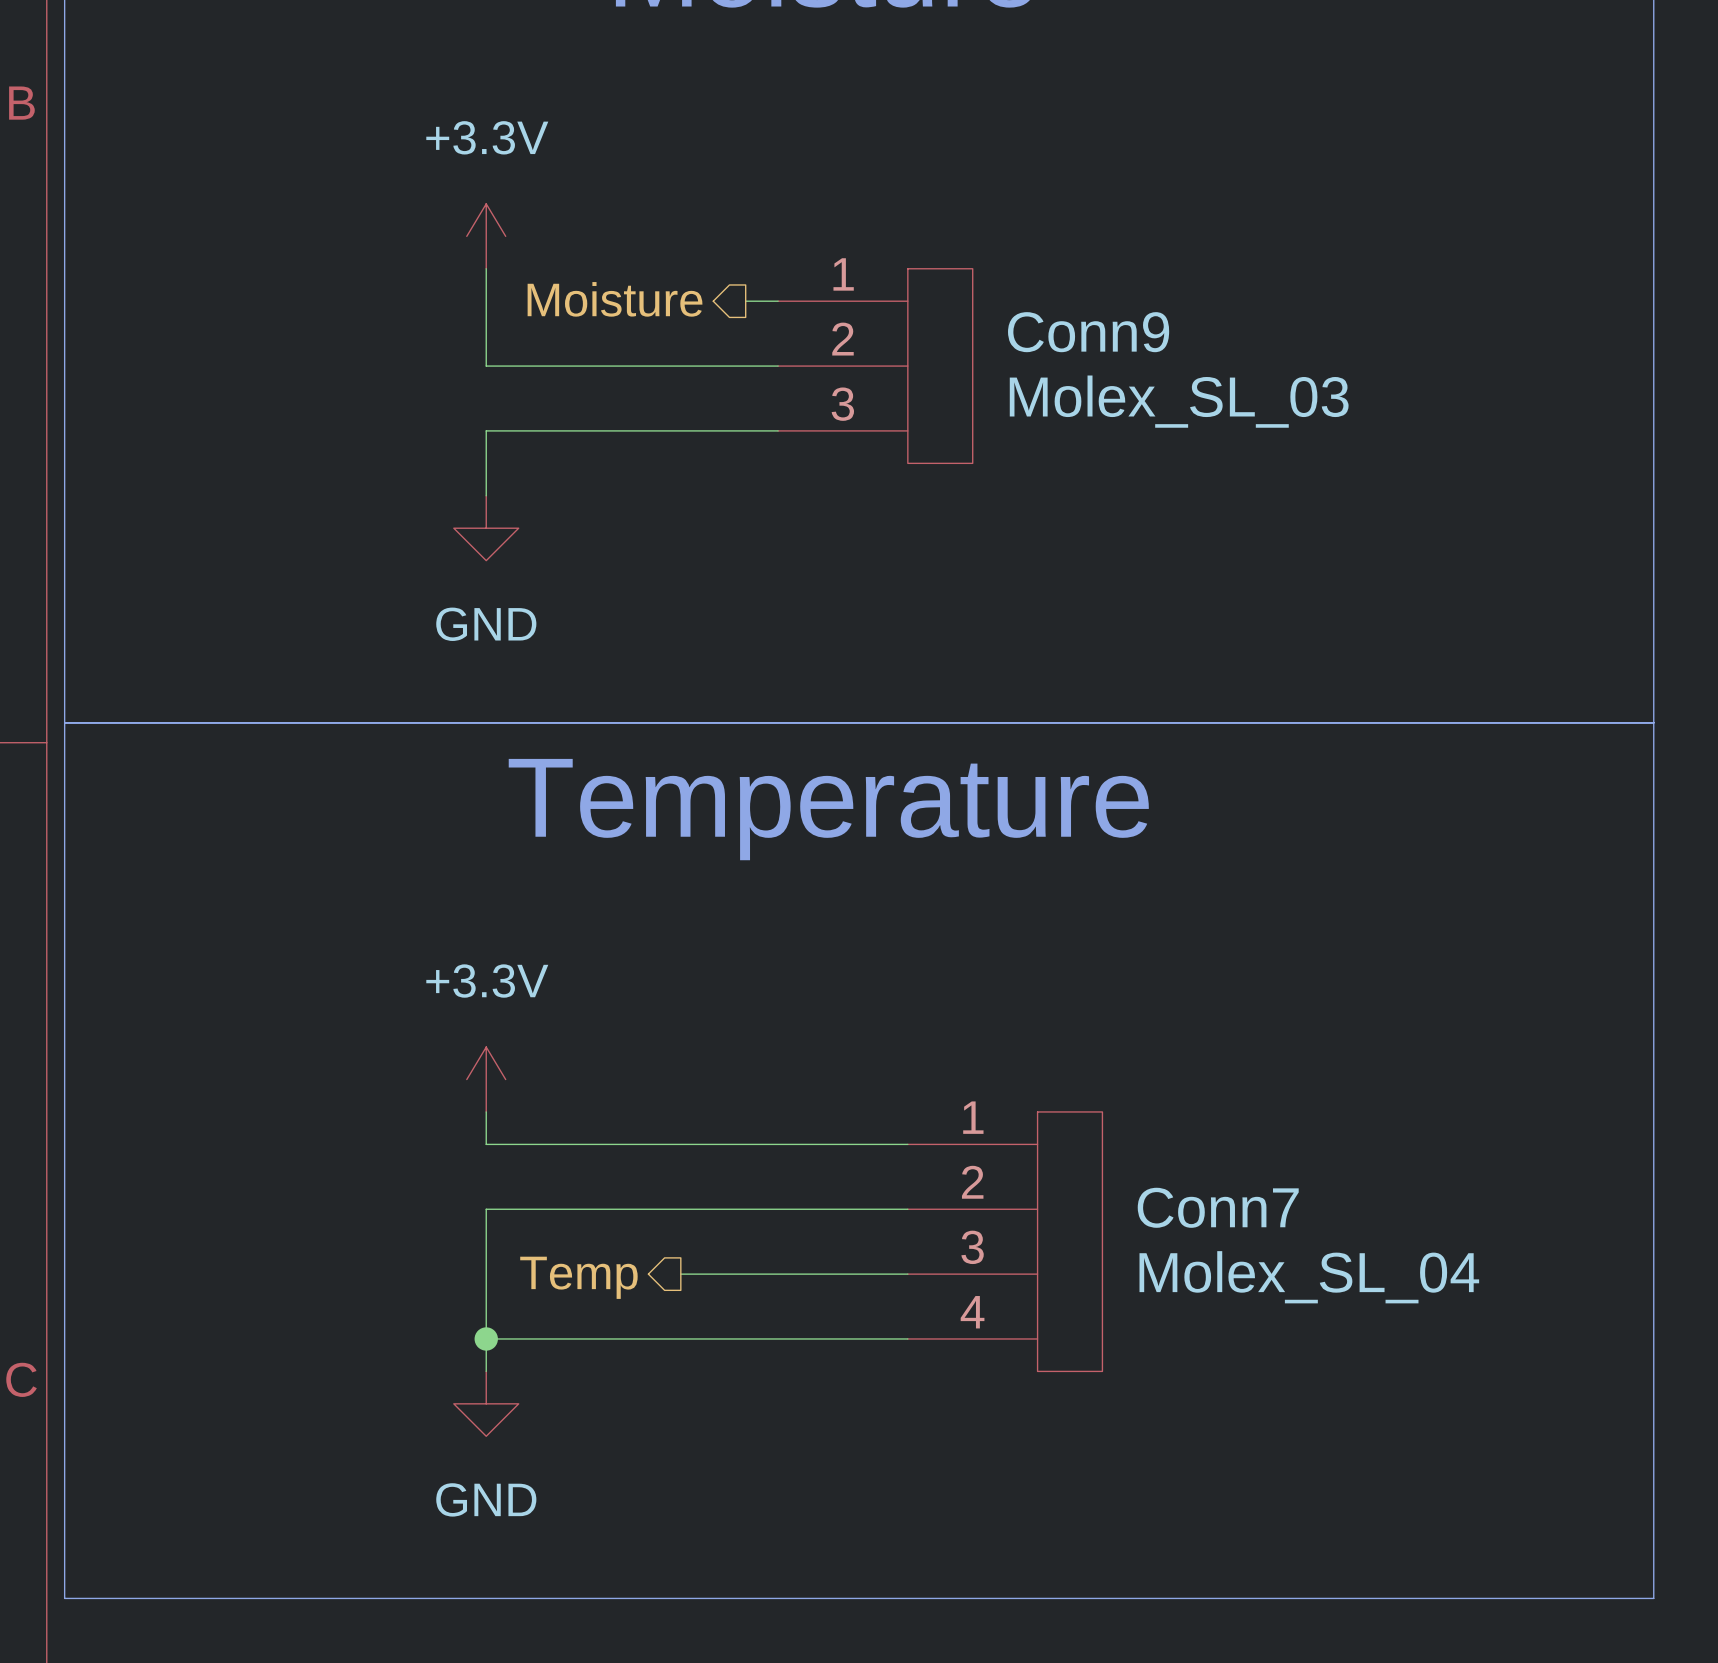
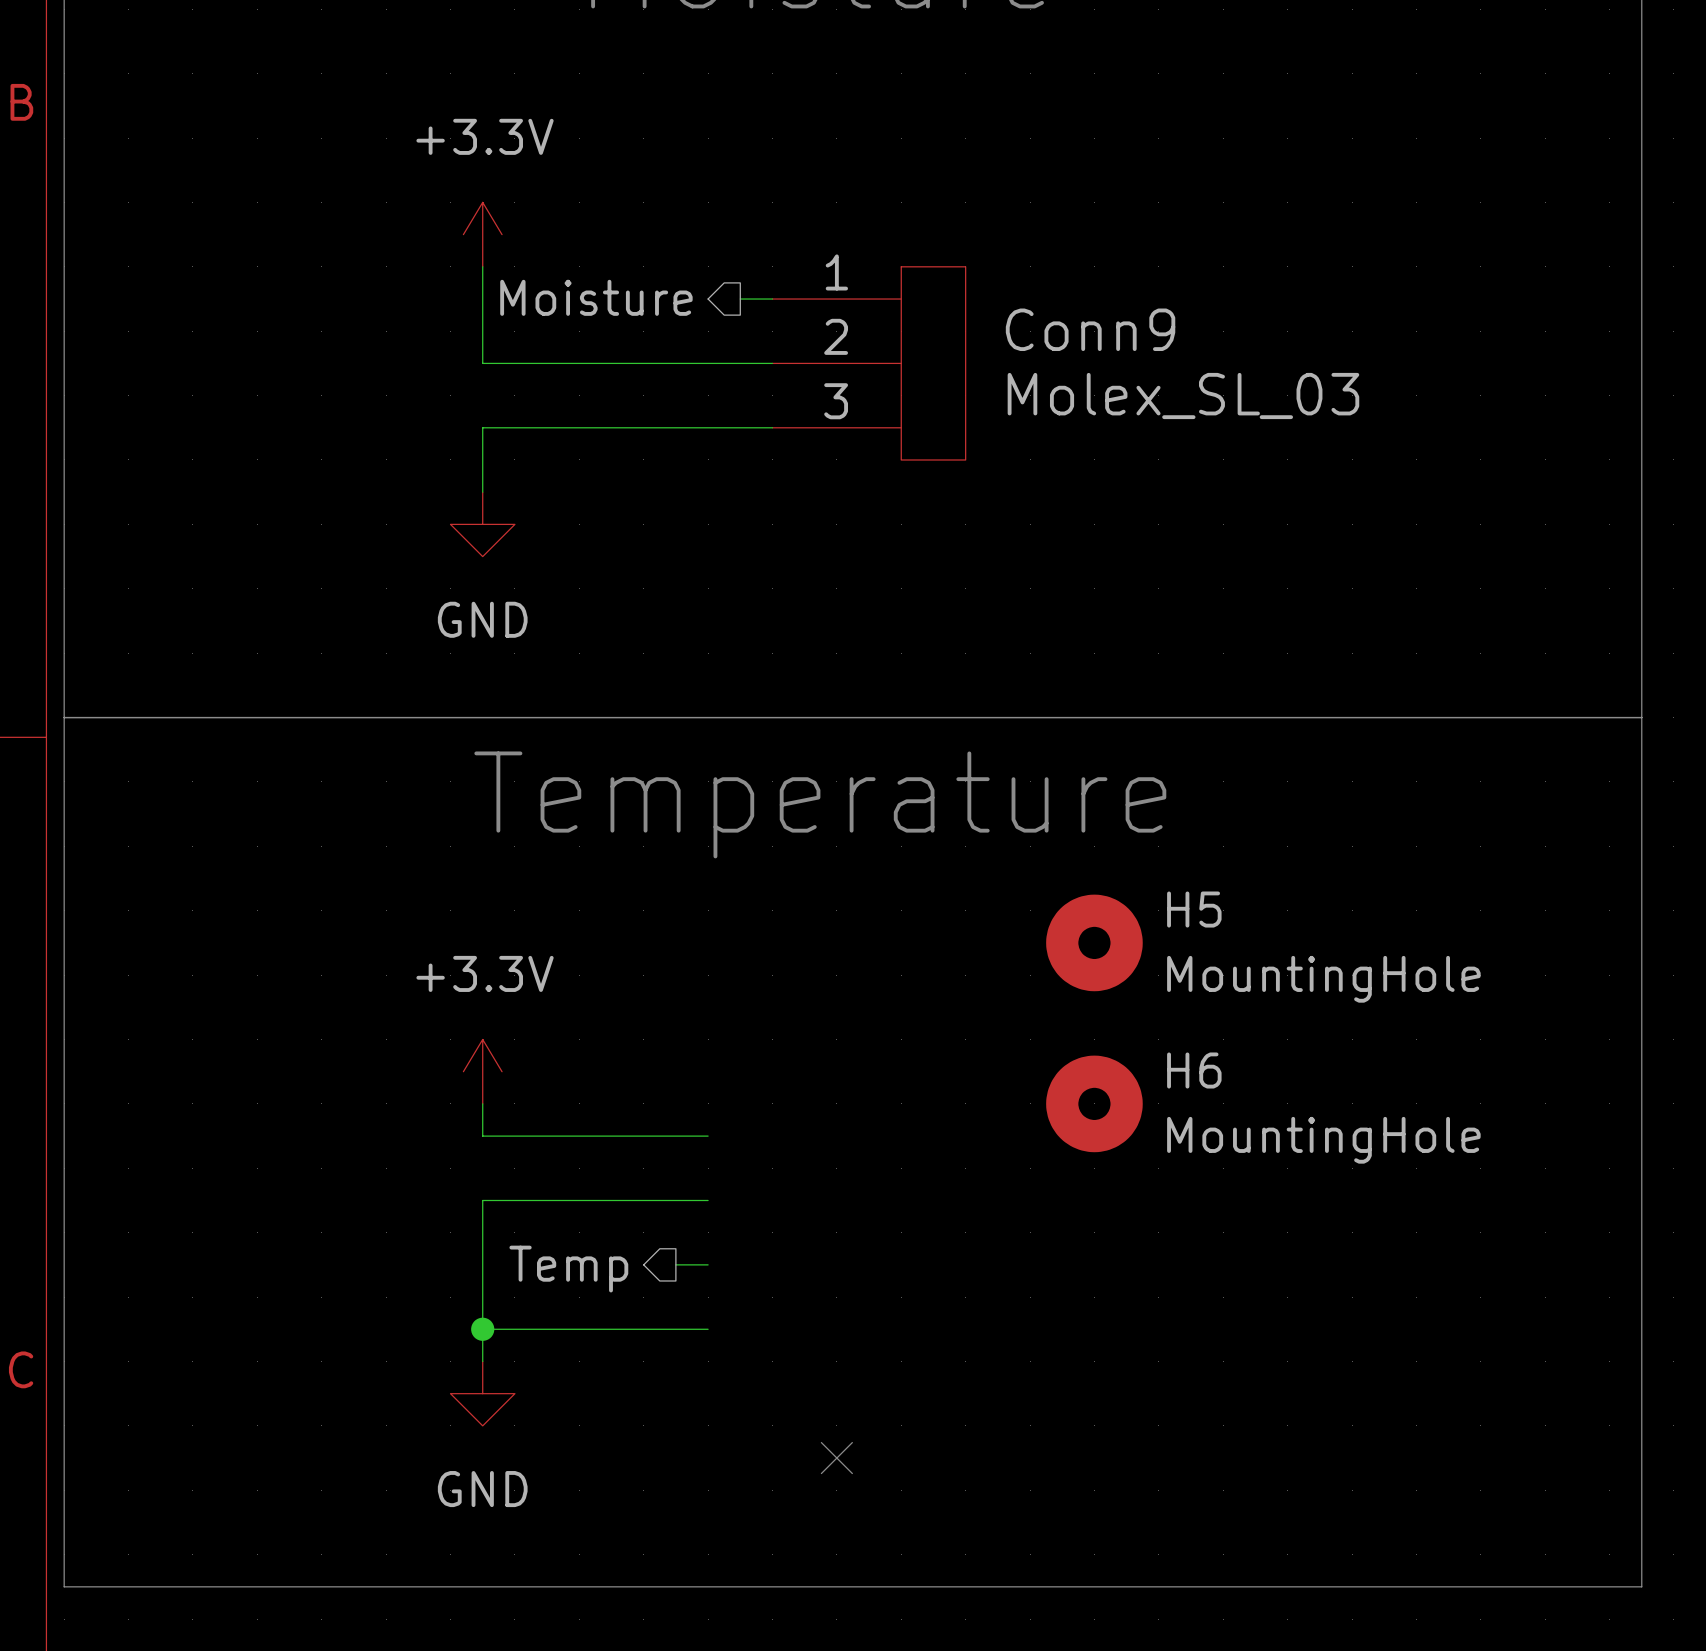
H5: none -> MountingHole (1094, 942)
H6: none -> MountingHole (1094, 1103)
wire: (713, 1144) (907, 1144) -> none
wire: (713, 1209) (907, 1209) -> none
Conn7: Molex_SL_04 (1005, 1241) -> none
wire: (713, 1274) (907, 1274) -> none
wire: (713, 1338) (907, 1338) -> none
no-connect mark: none -> (836, 1458)

